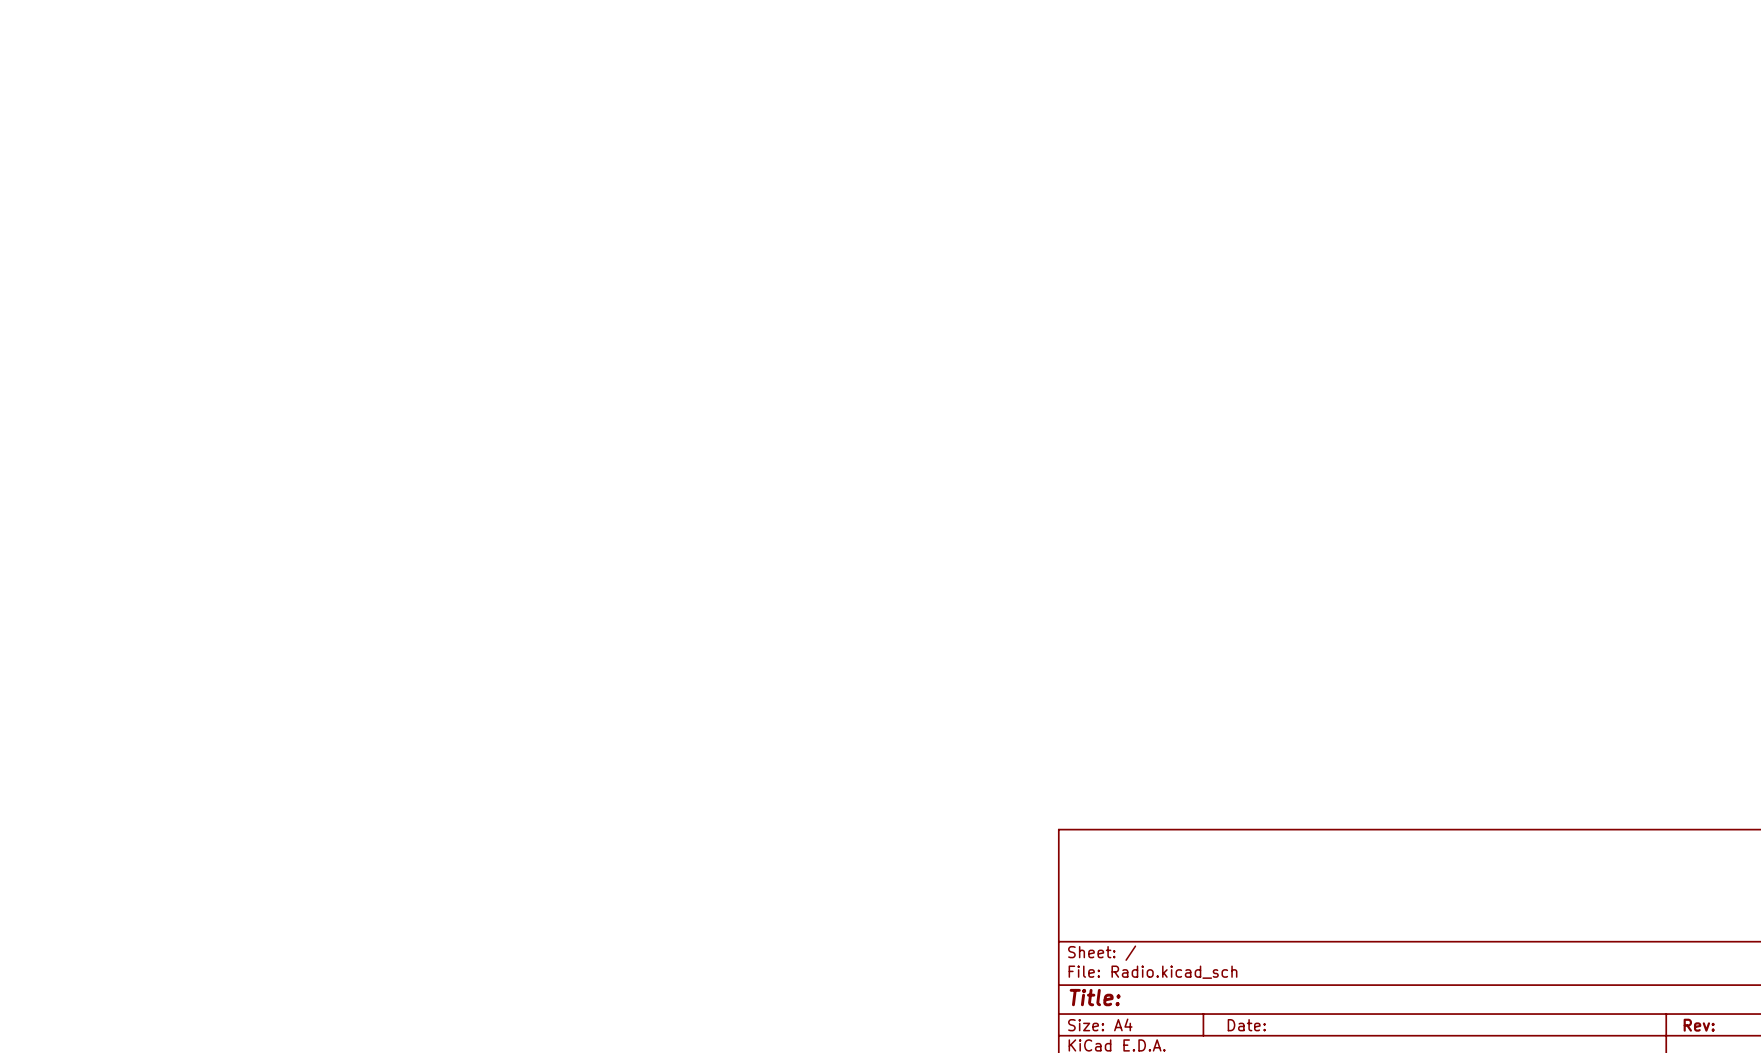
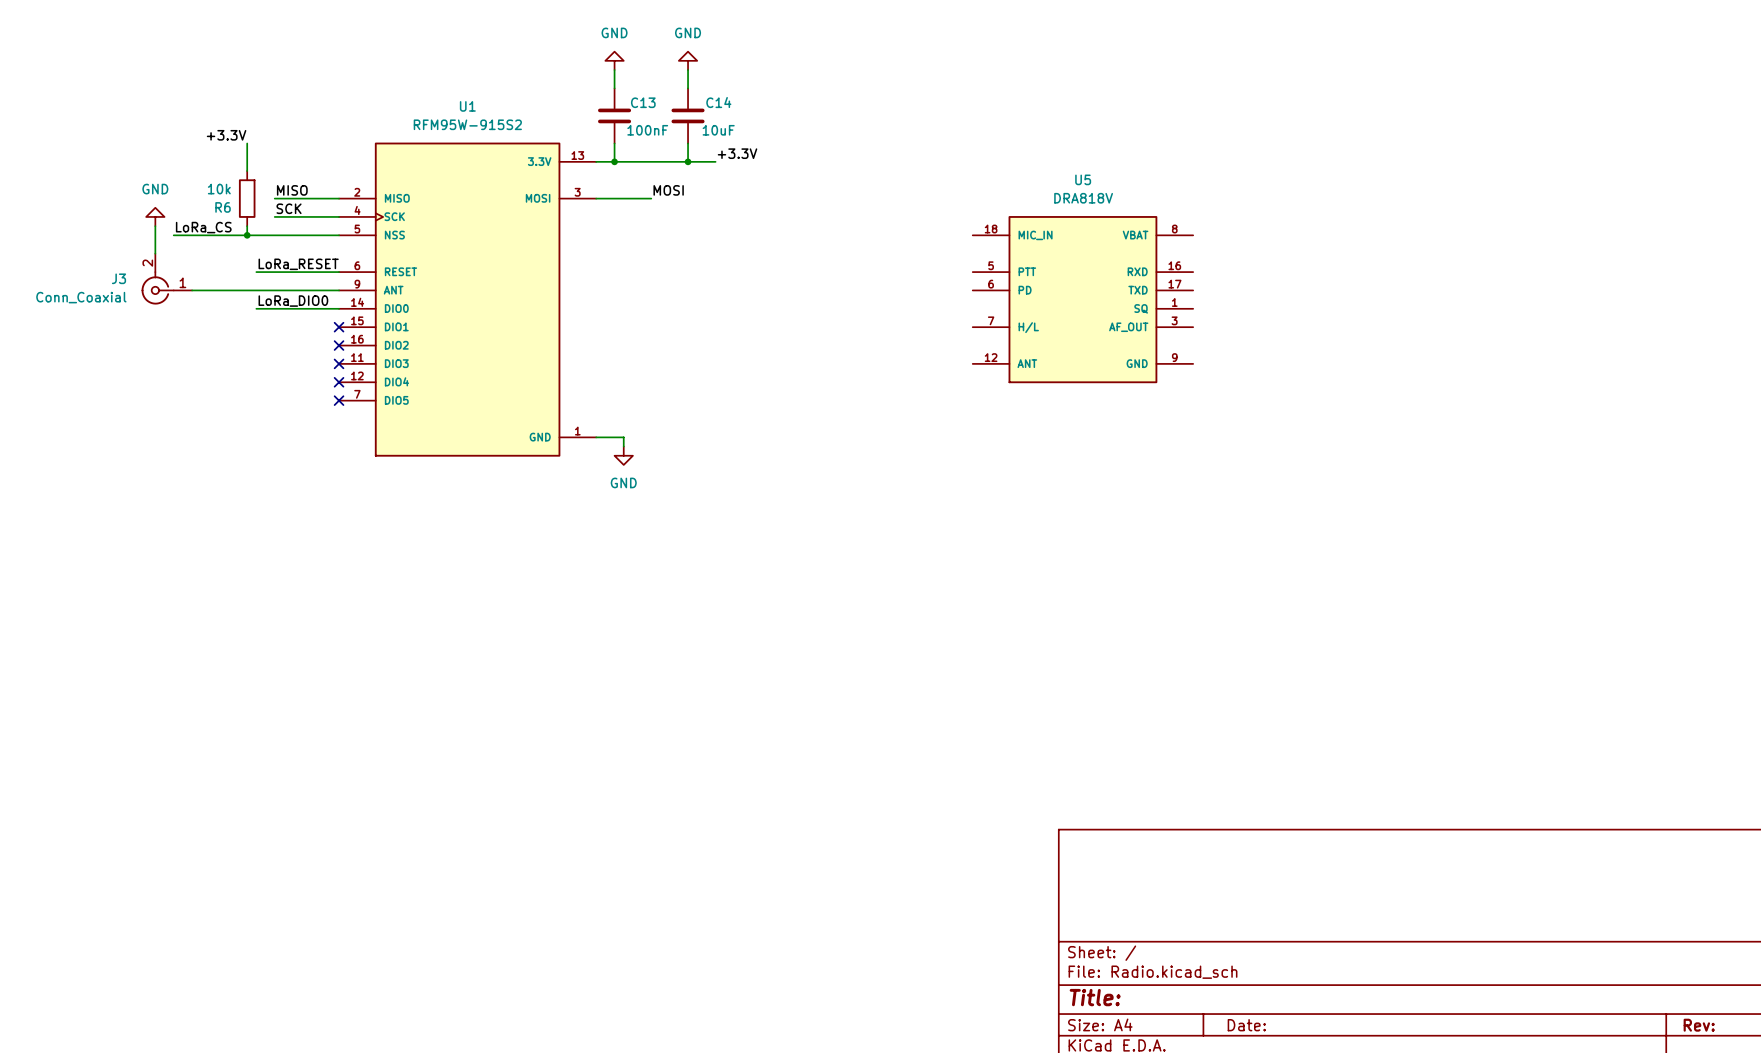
power symbol: none -> GND (614, 60)
power symbol: none -> GND (688, 60)
wire: none -> (614, 70) (614, 88)
wire: none -> (688, 70) (688, 88)
C13: none -> 100nF (614, 115)
C14: none -> 10uF (688, 115)
label: none -> +3.3V (226, 135)
wire: none -> (247, 143) (247, 171)
wire: none -> (614, 143) (614, 161)
wire: none -> (688, 143) (688, 161)
label: none -> +3.3V (737, 153)
wire: none -> (596, 161) (715, 161)
junction: none -> (614, 161)
junction: none -> (688, 161)
label: none -> MISO (292, 190)
label: none -> MOSI (668, 190)
R6: none -> 10k (247, 198)
wire: none -> (274, 198) (339, 198)
wire: none -> (596, 198) (651, 198)
label: none -> SCK (289, 208)
power symbol: none -> GND (155, 216)
wire: none -> (274, 216) (339, 216)
wire: none -> (155, 226) (155, 253)
wire: none -> (247, 226) (247, 235)
label: none -> LoRa_CS (203, 227)
wire: none -> (173, 235) (339, 235)
junction: none -> (247, 235)
label: none -> LoRa_RESET (298, 264)
wire: none -> (256, 272) (339, 272)
J3: none -> Conn_Coaxial (166, 279)
wire: none -> (192, 290) (339, 290)
U1: none -> RFM95W-915S2 (467, 299)
U5: none -> DRA818V (1082, 299)
label: none -> LoRa_DIO0 (293, 301)
wire: none -> (256, 308) (339, 308)
no-connect mark: none -> (339, 327)
no-connect mark: none -> (339, 345)
no-connect mark: none -> (339, 363)
no-connect mark: none -> (339, 382)
no-connect mark: none -> (339, 400)
wire: none -> (596, 437) (623, 437) (623, 446)
power symbol: none -> GND (623, 455)

